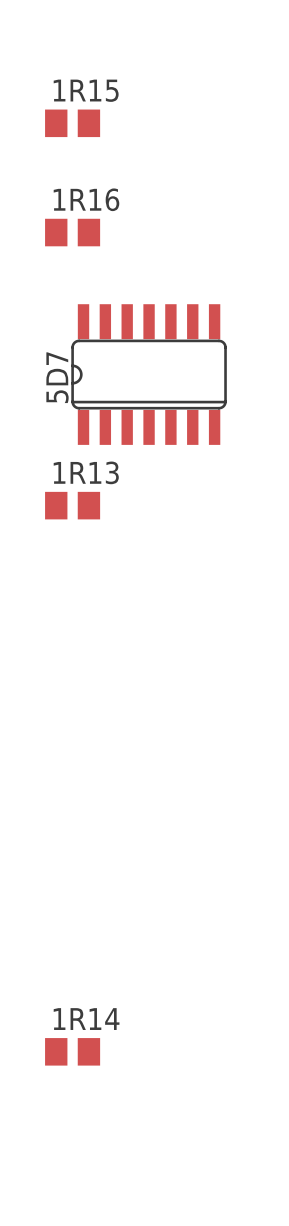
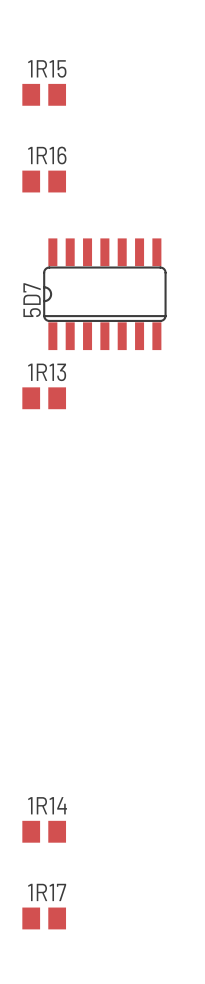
1R17: none -> (44, 918)

